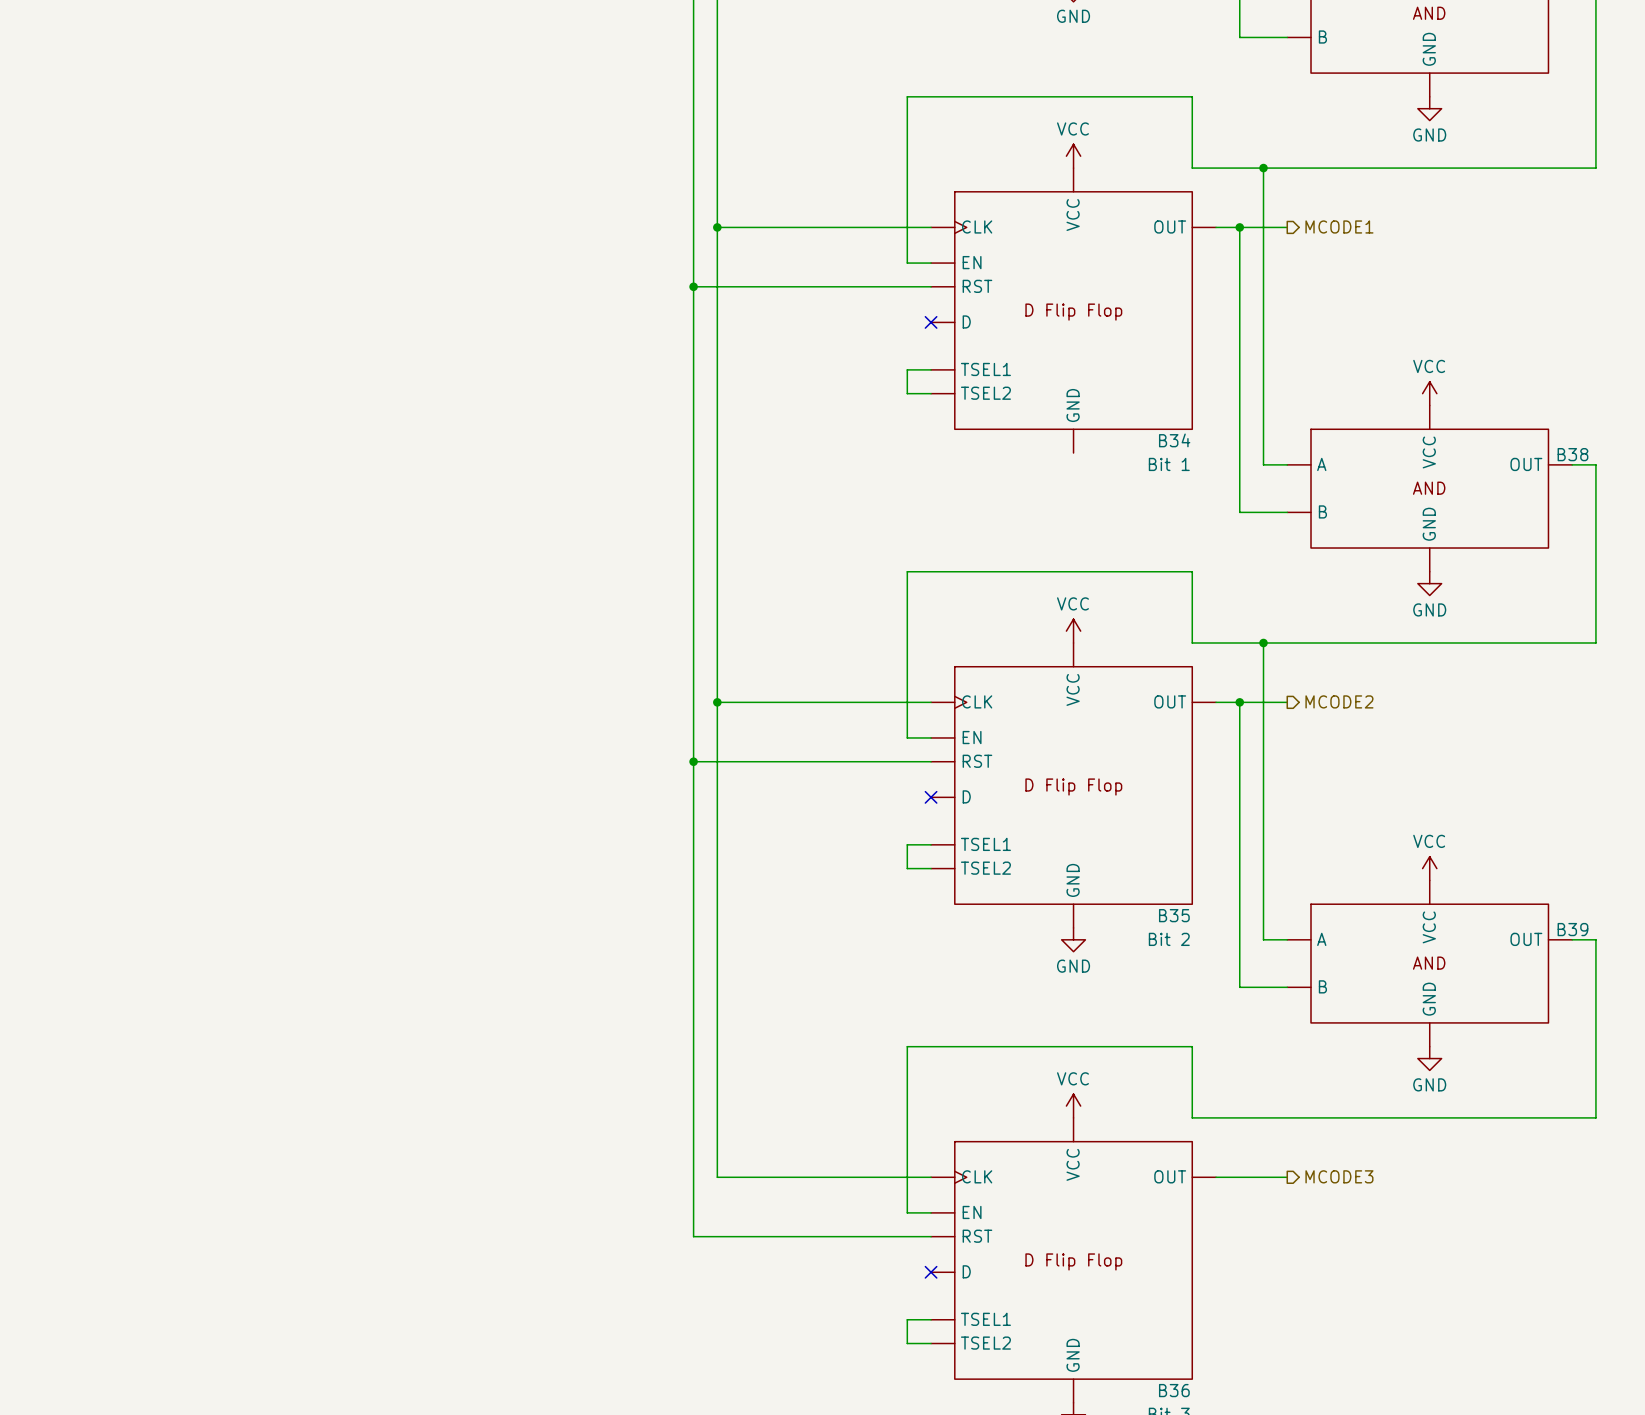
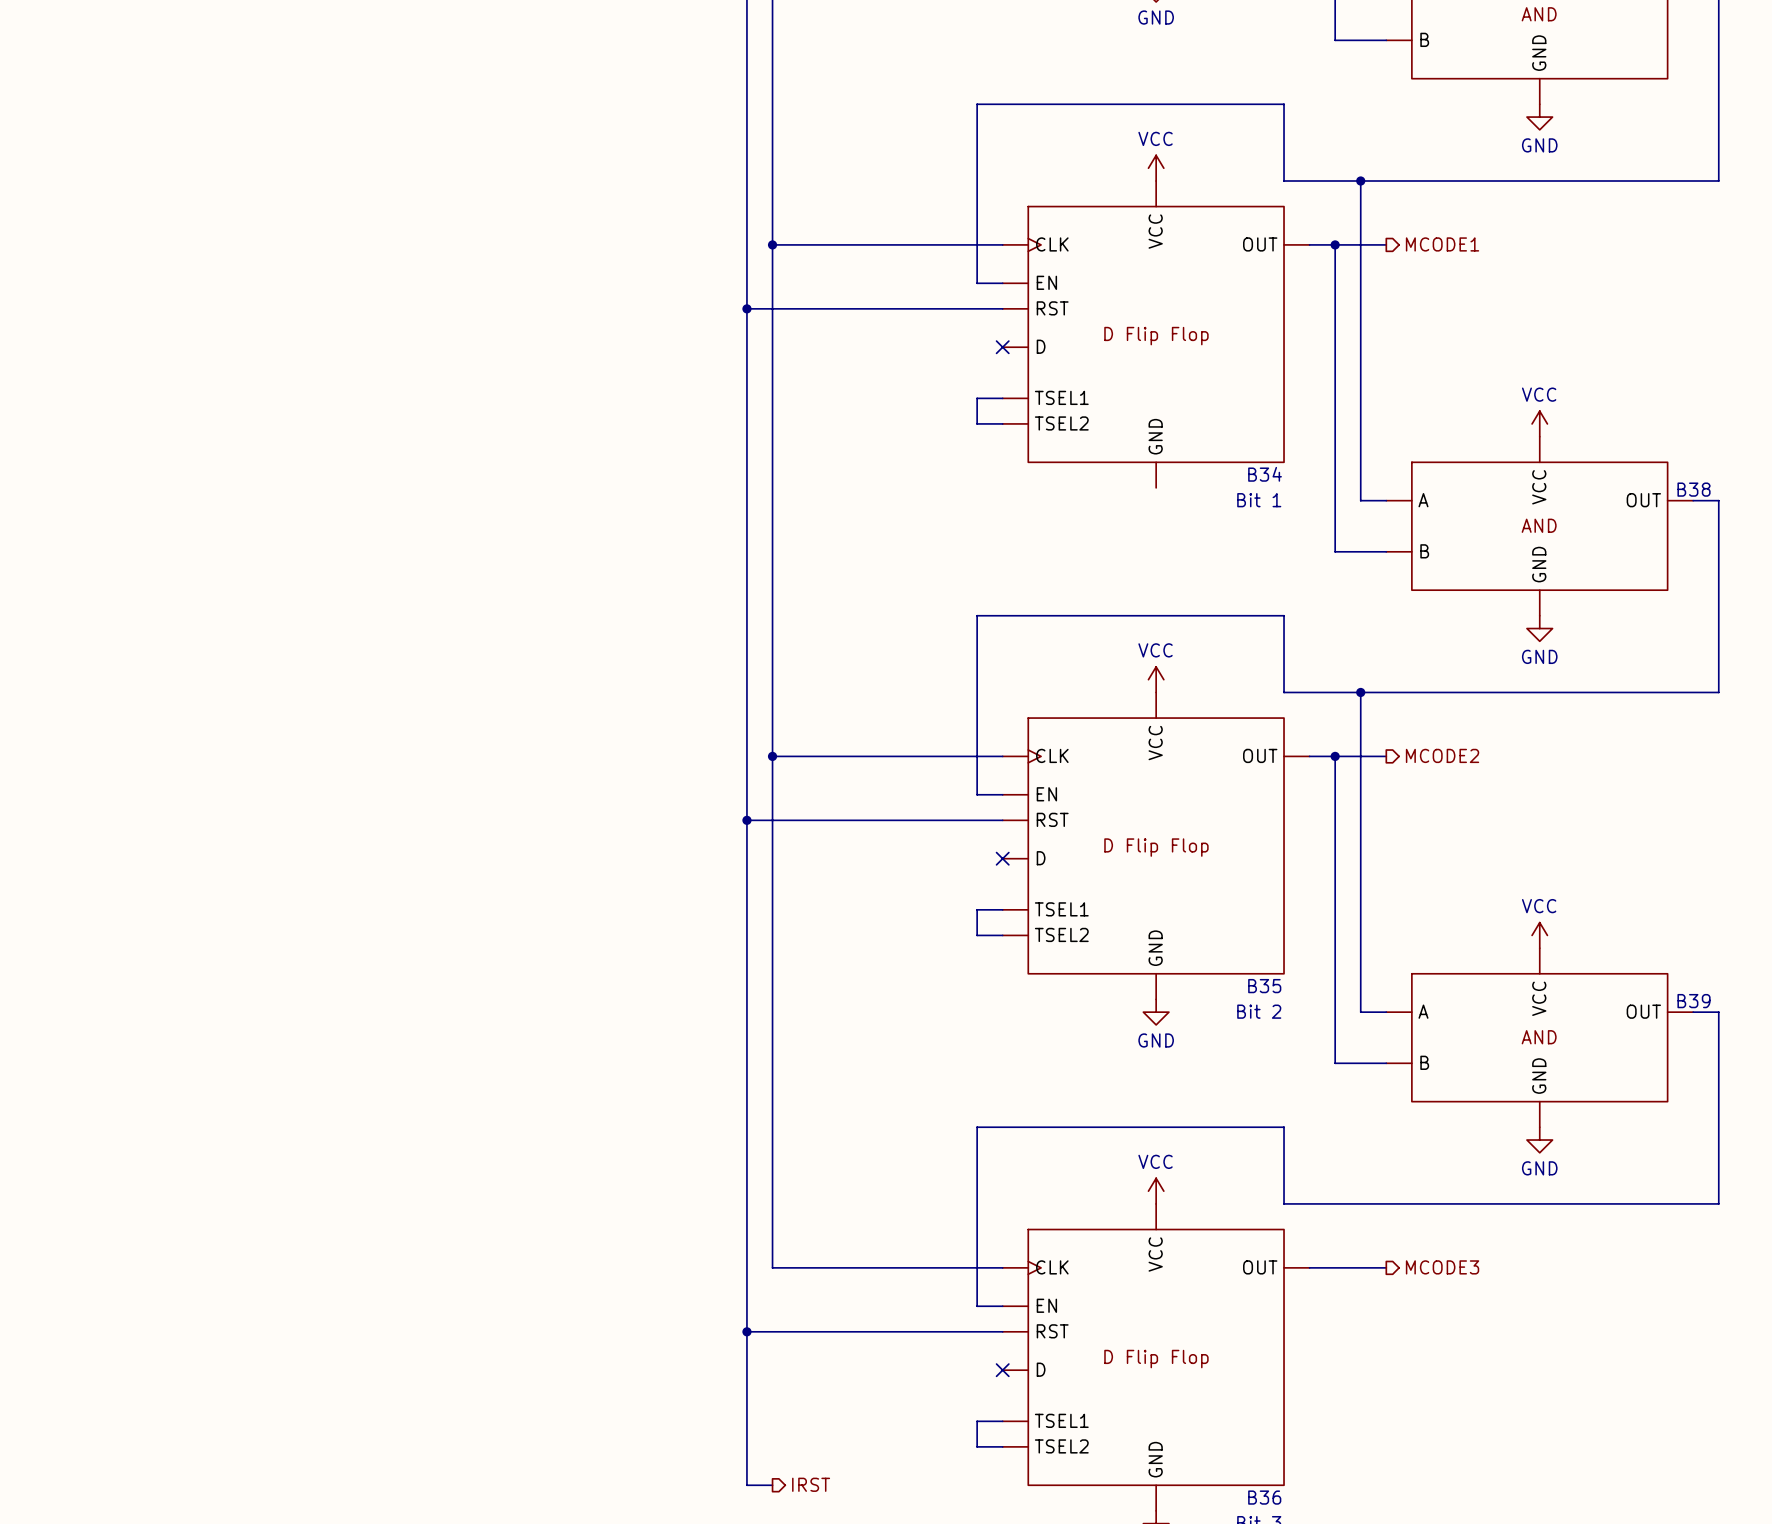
wire: none -> (746, 1331) (746, 1485) (772, 1485)
junction: none -> (746, 1331)
hierarchical label: none -> IRST (811, 1484)

